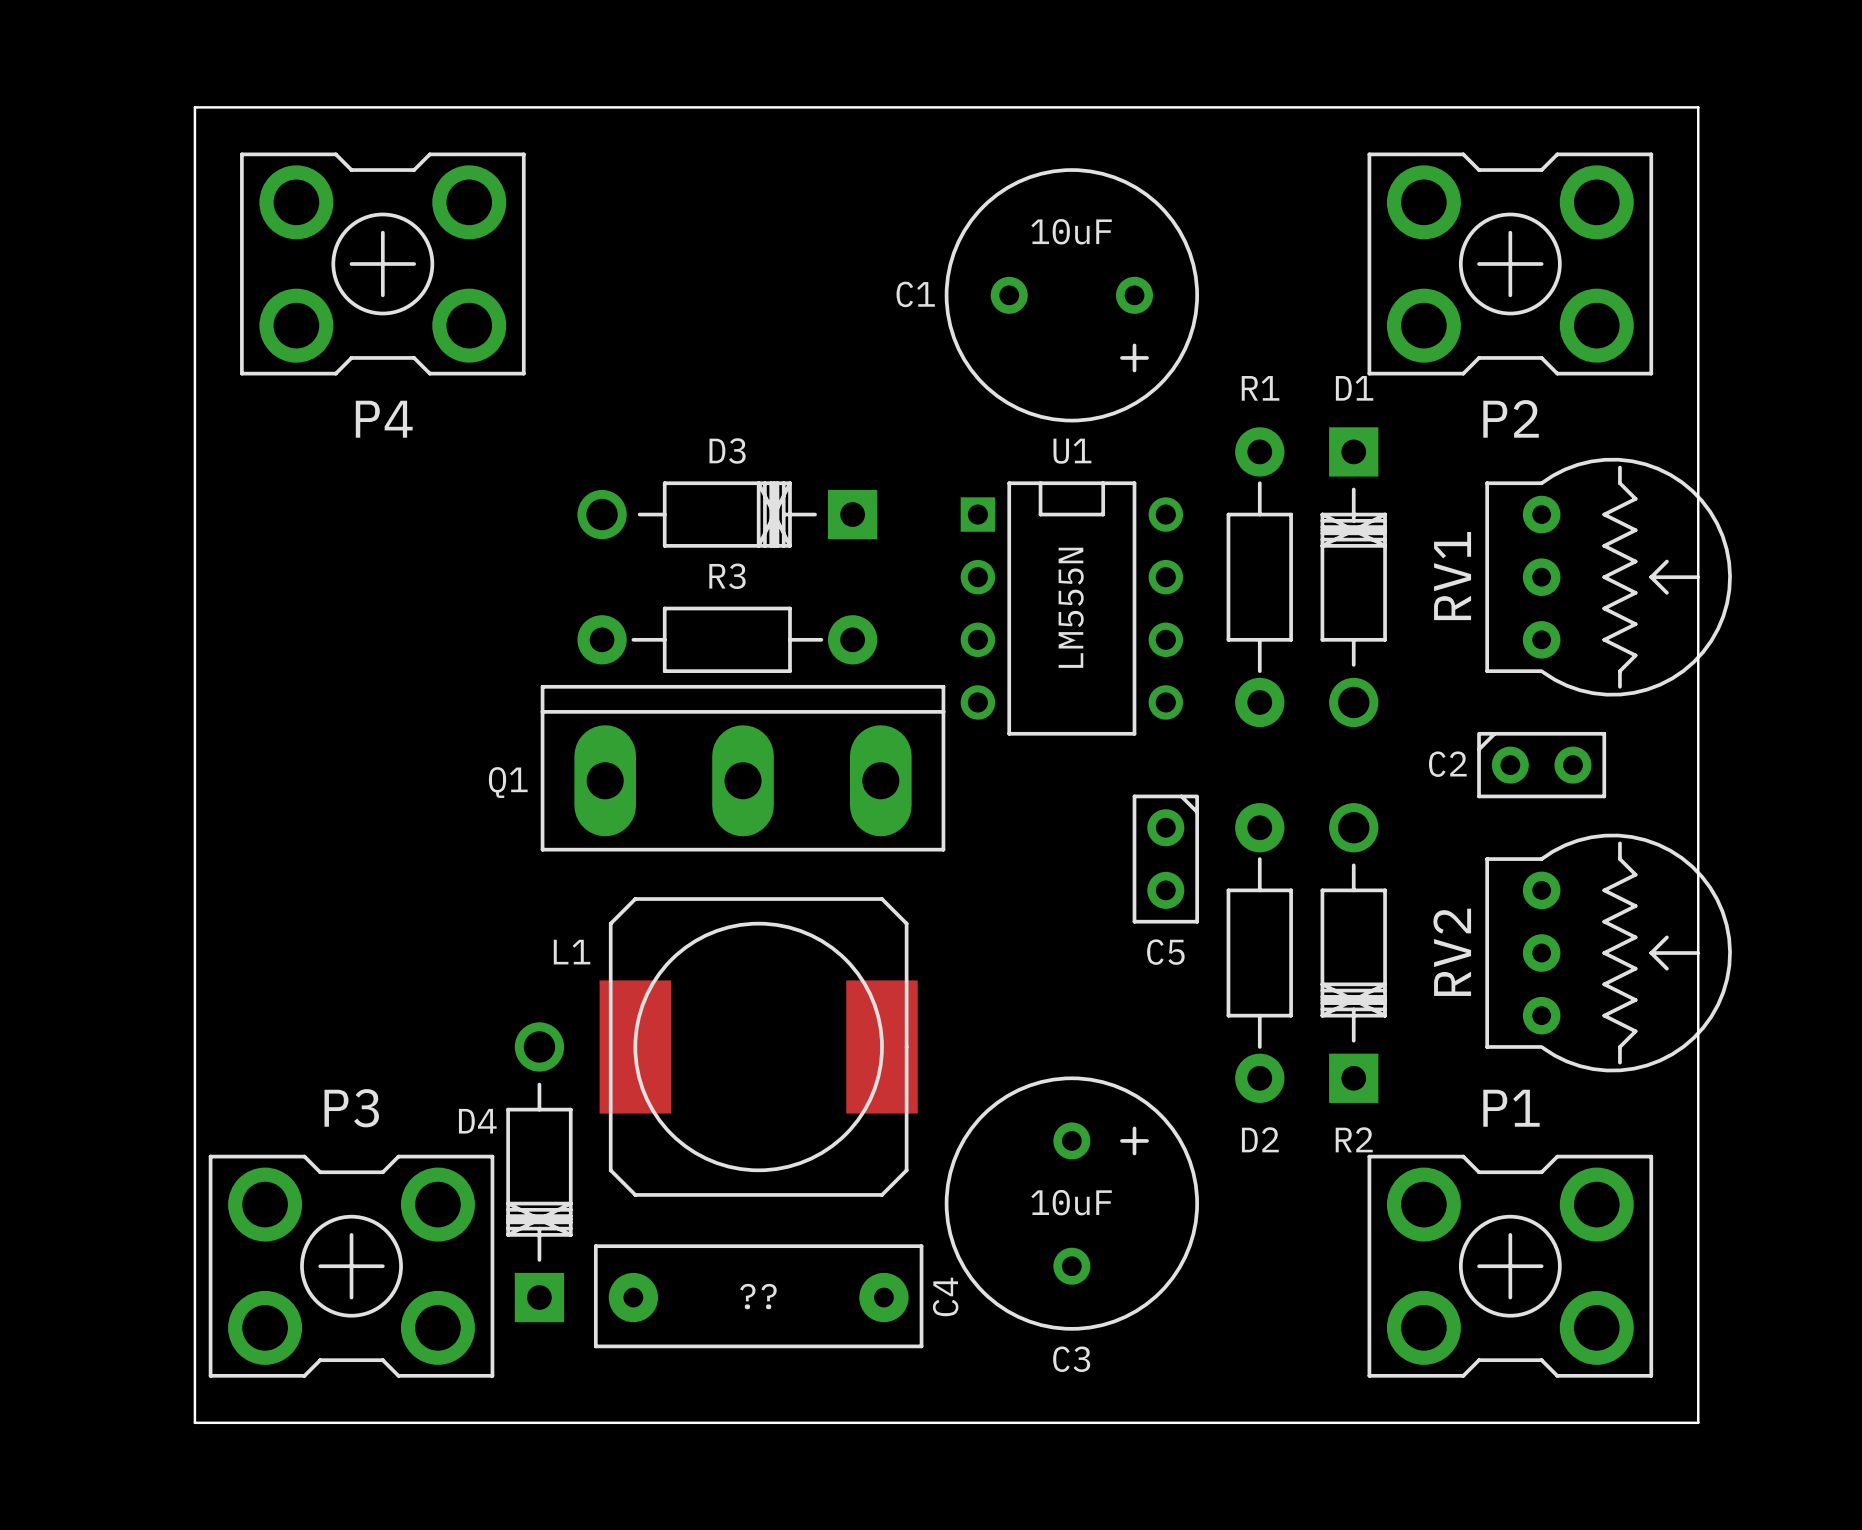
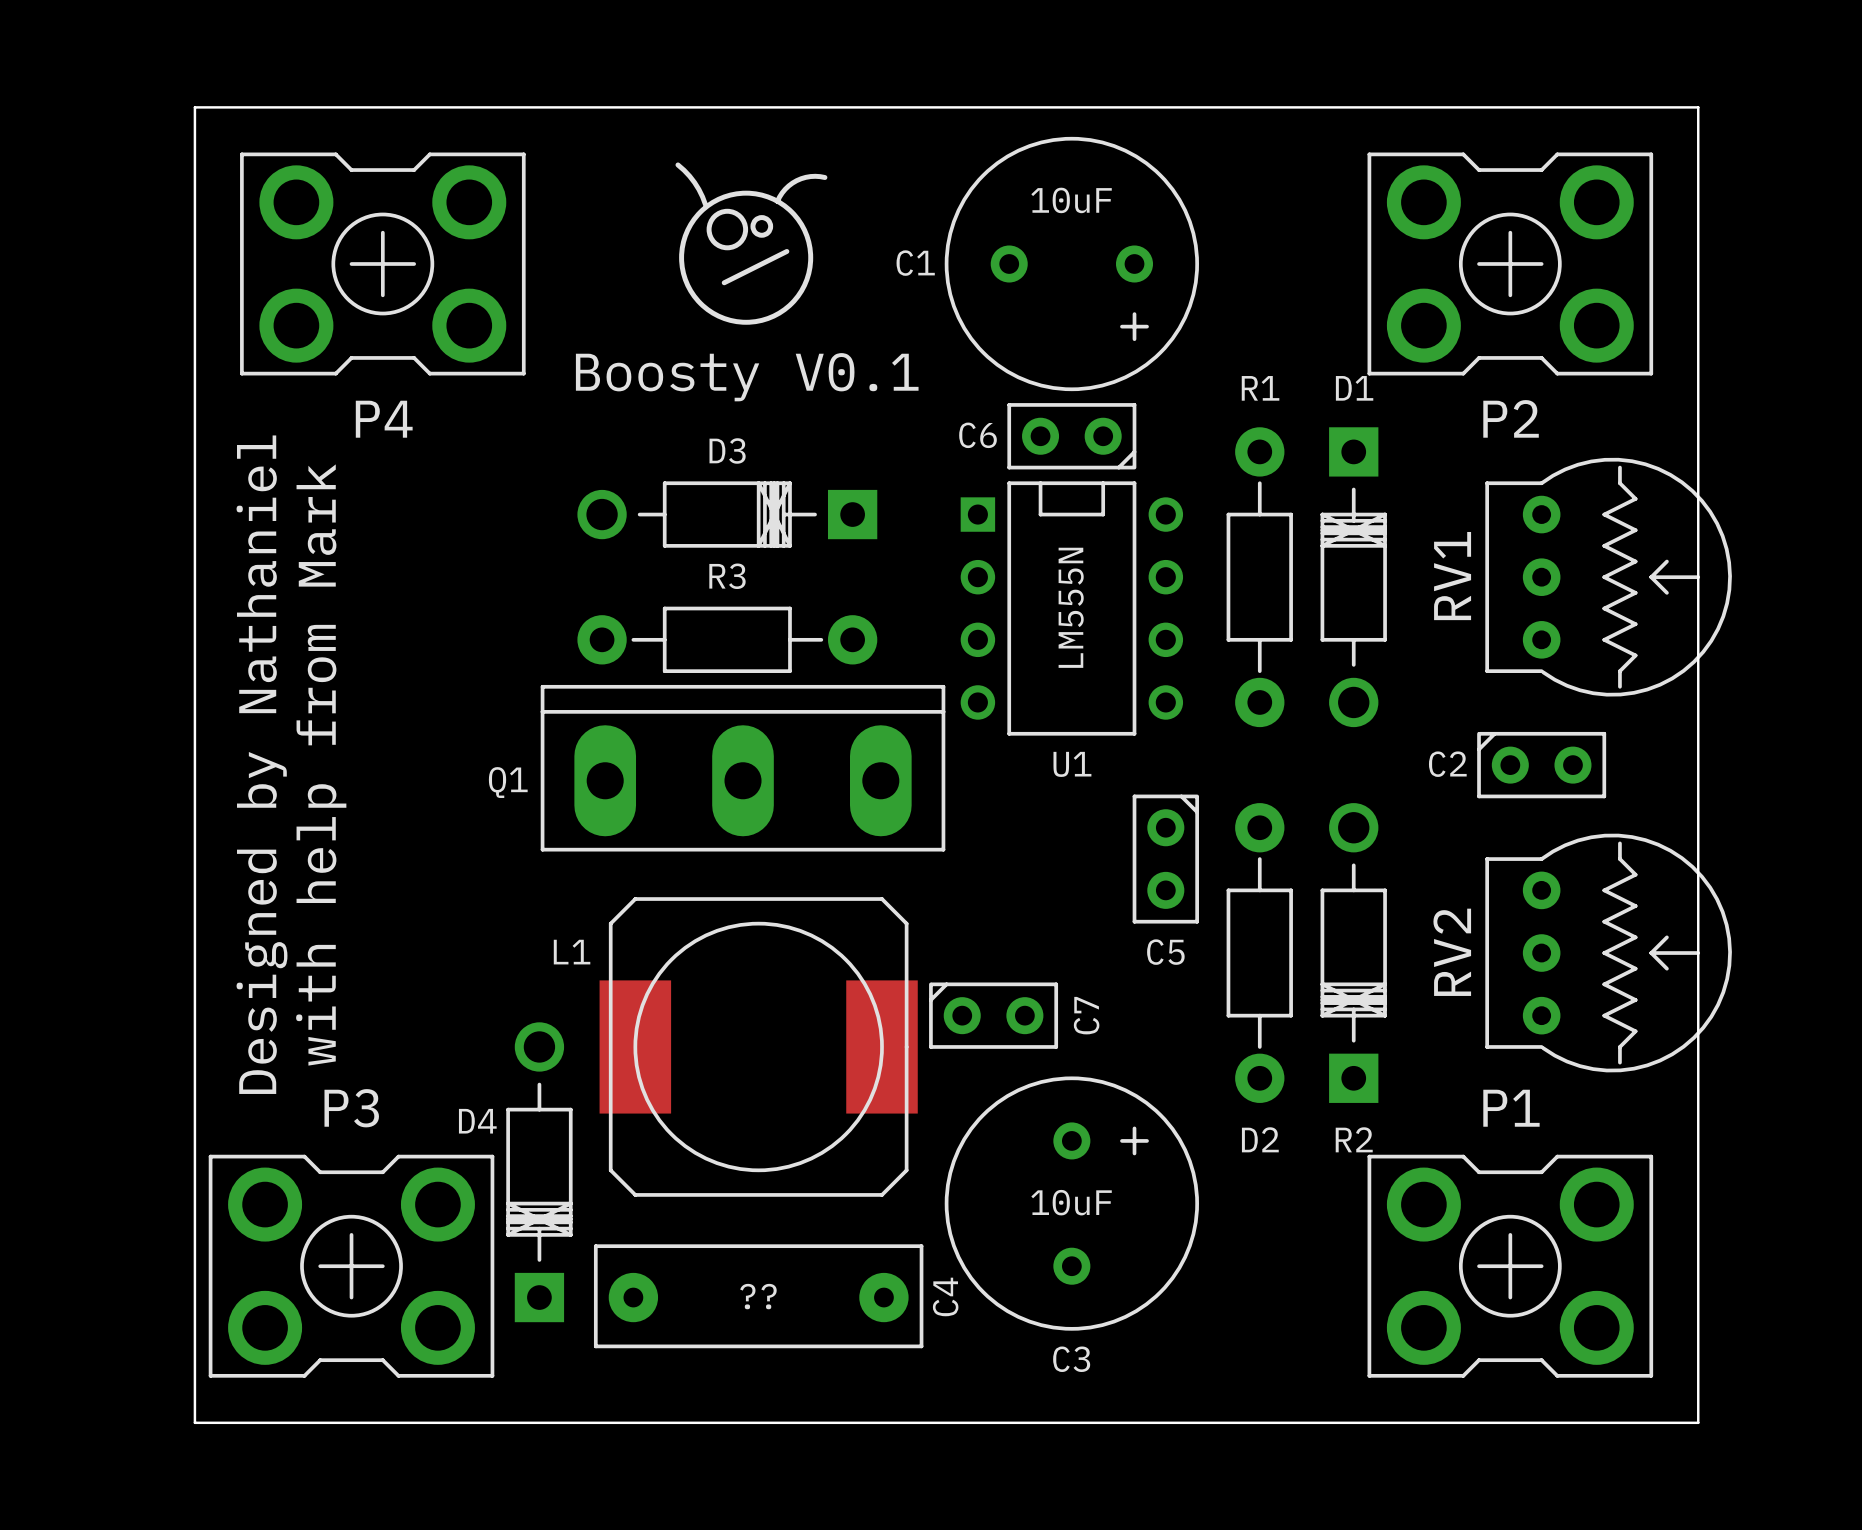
line: none -> (677, 164) (694, 182) (705, 204)
line: none -> (824, 177) (810, 176) (796, 180) (785, 189) (777, 201)
drawing: none -> [679, 190, 814, 325]
line: none -> (786, 251) (724, 282)
C1 position: (1071, 295) -> (1071, 263)
text: none -> Boosty V0.1 (747, 377)
C6: none -> (1071, 436)
U1 name position: U1 (1072, 451) -> U1 (1072, 764)
text: none -> Designed by Nathaniel (262, 764)
text: none -> with help from Mark (321, 764)
C7: none -> (993, 1015)

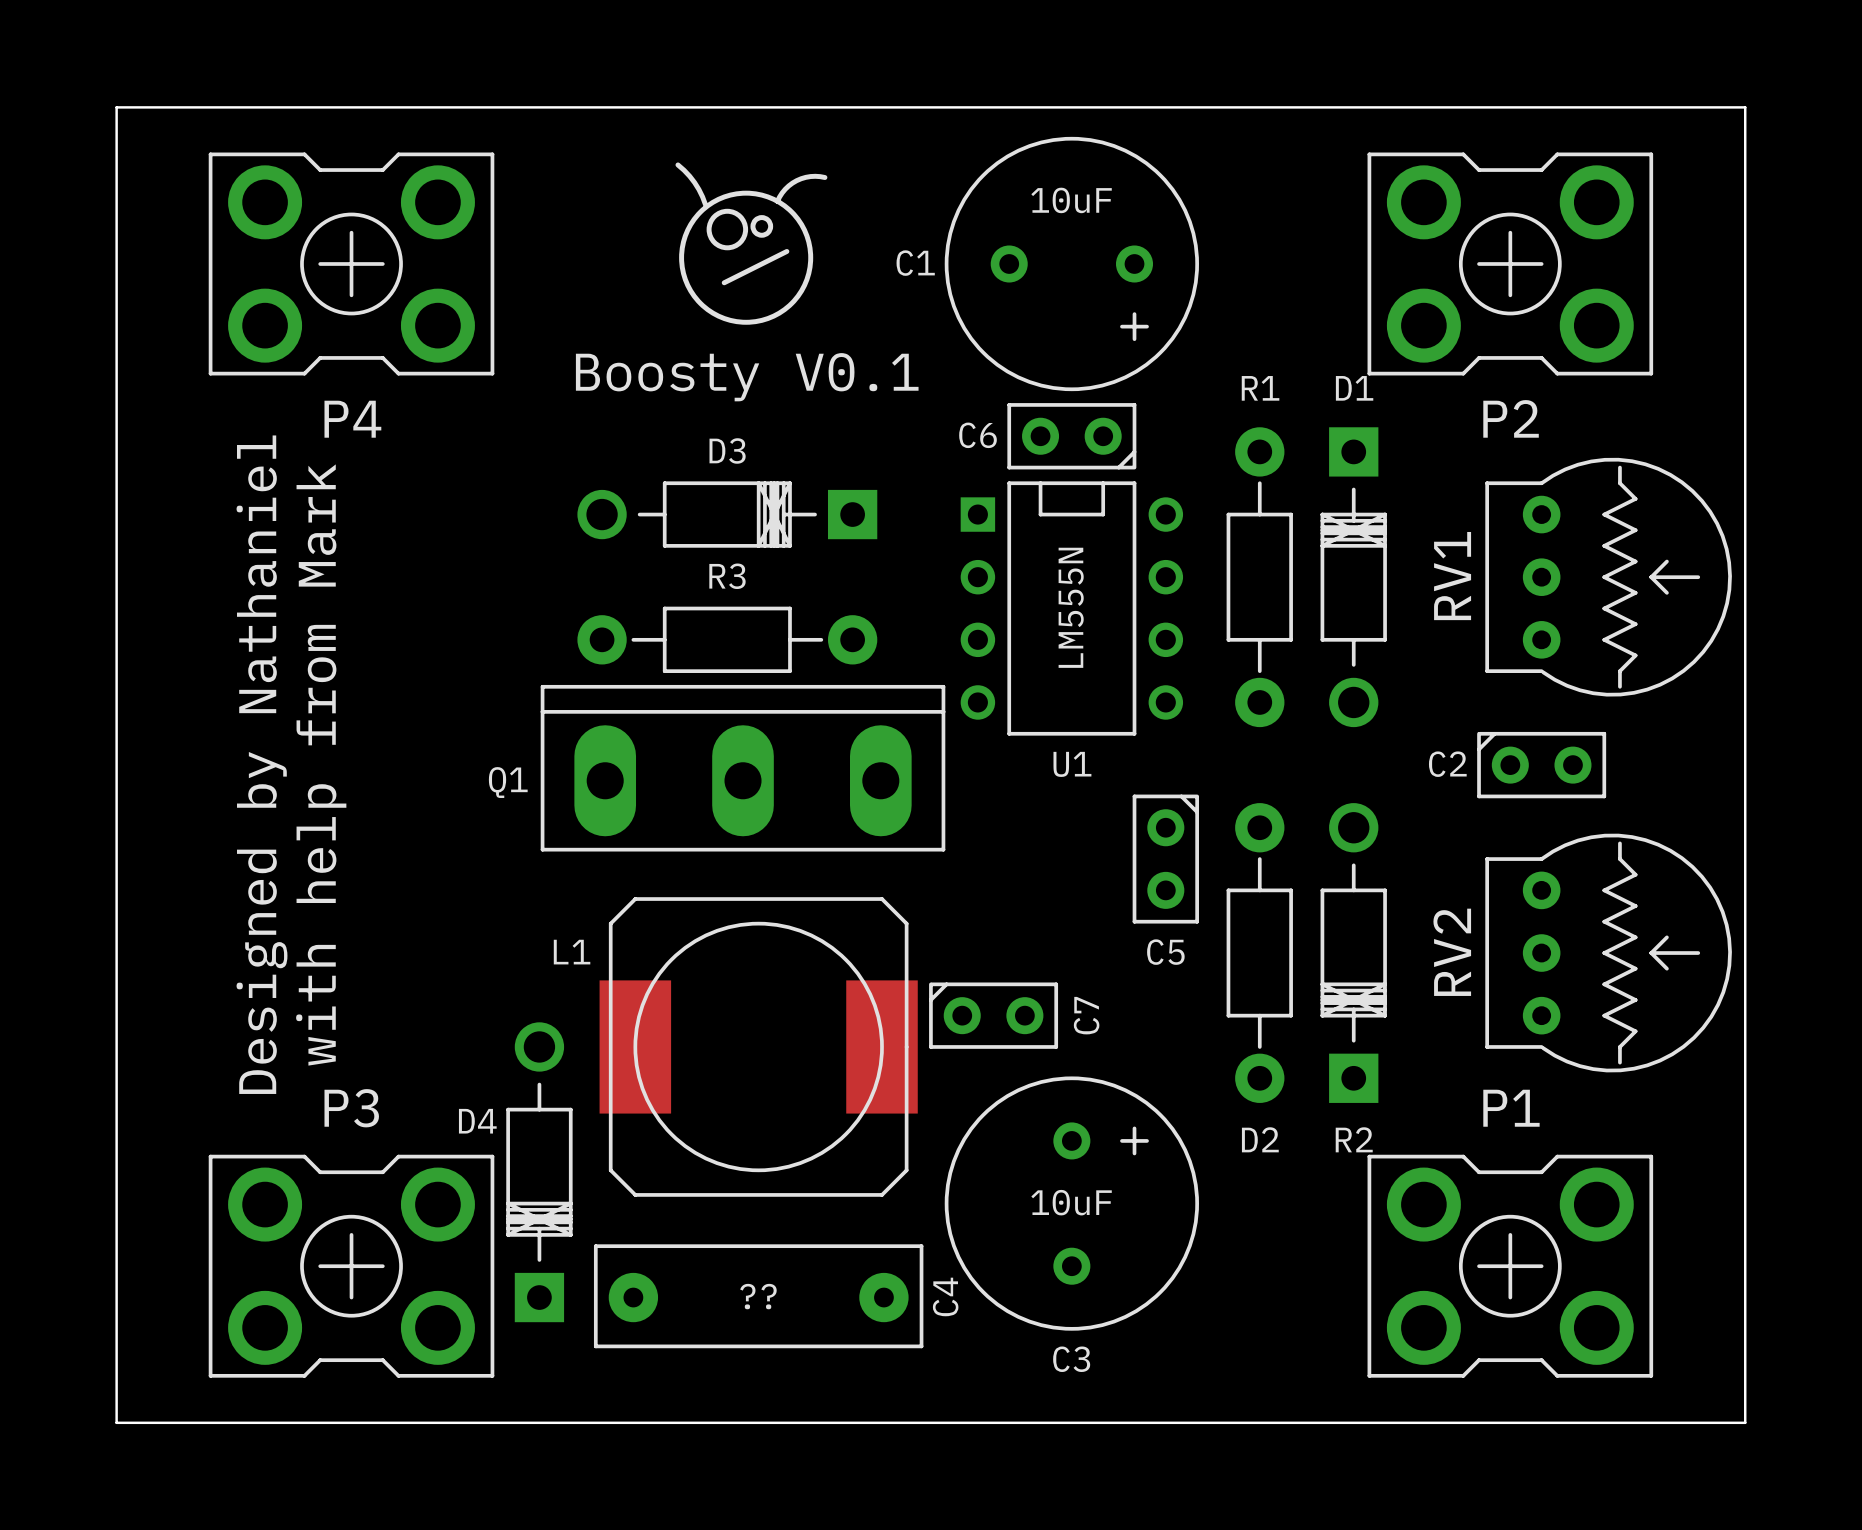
board edge: (194, 107) (194, 1422) -> (194, 107) (116, 107) (116, 1422) (194, 1422)
board edge: (1698, 107) (1698, 1422) -> (1698, 107) (1745, 107) (1745, 1422) (1698, 1422)
P4 position: (382, 263) -> (351, 263)

